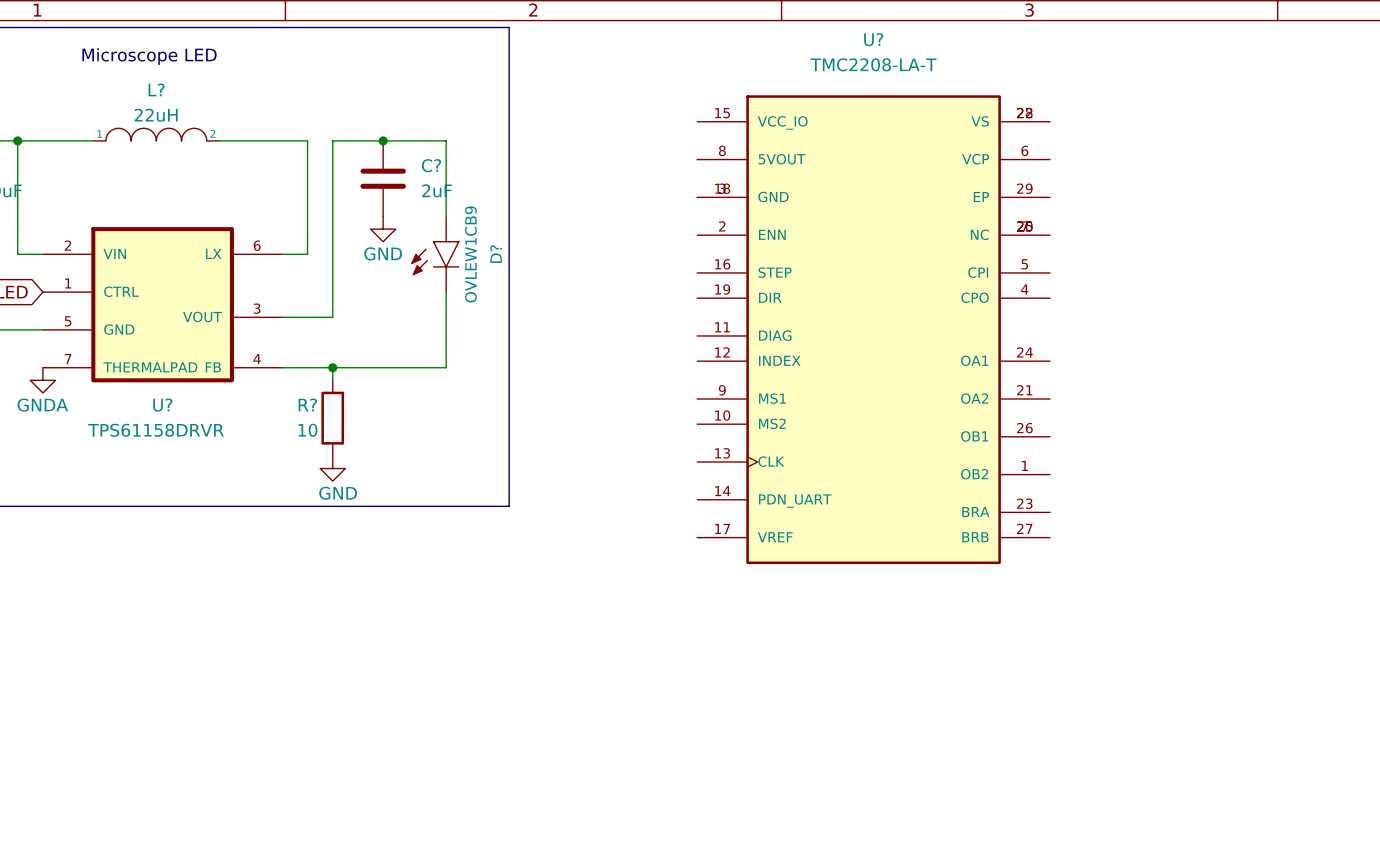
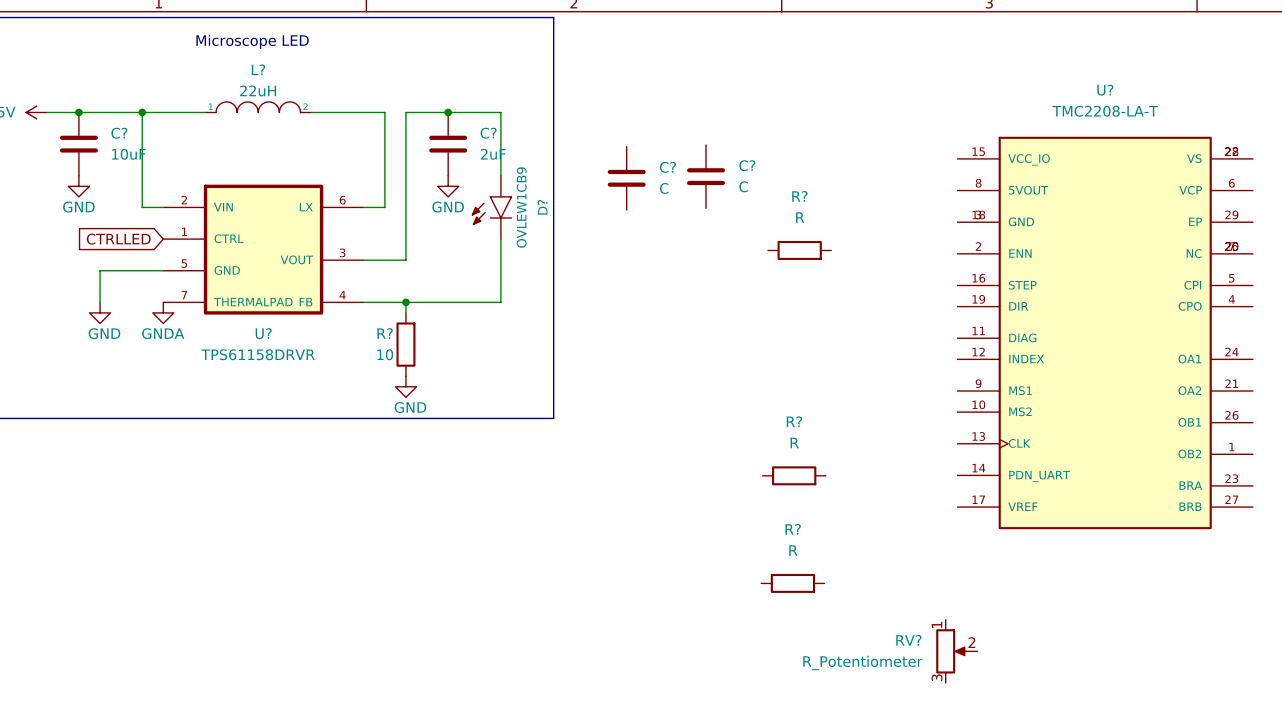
C?: none -> C (706, 176)
C?: none -> C (626, 178)
R?: none -> R (799, 250)
U?: TMC2208-LA-T (873, 329) -> none
U?: none -> TMC2208-LA-T (1105, 332)
R?: none -> R (794, 475)
R?: none -> R (792, 583)
RV?: none -> R_Potentiometer (956, 651)

